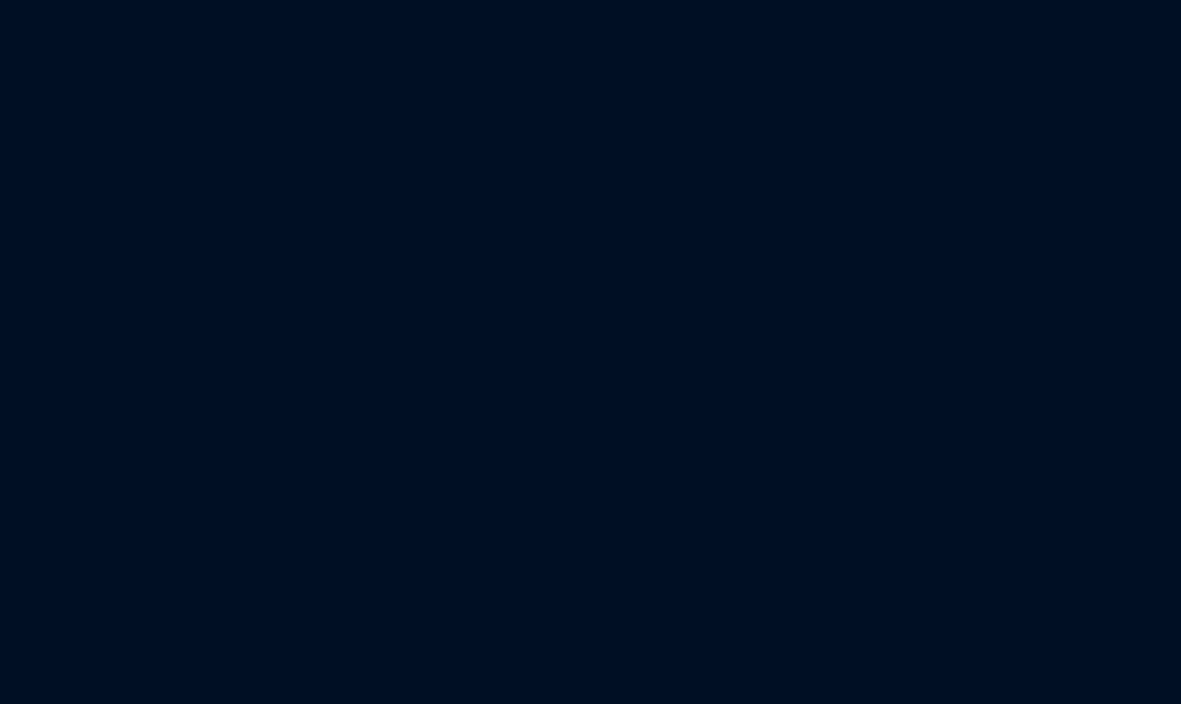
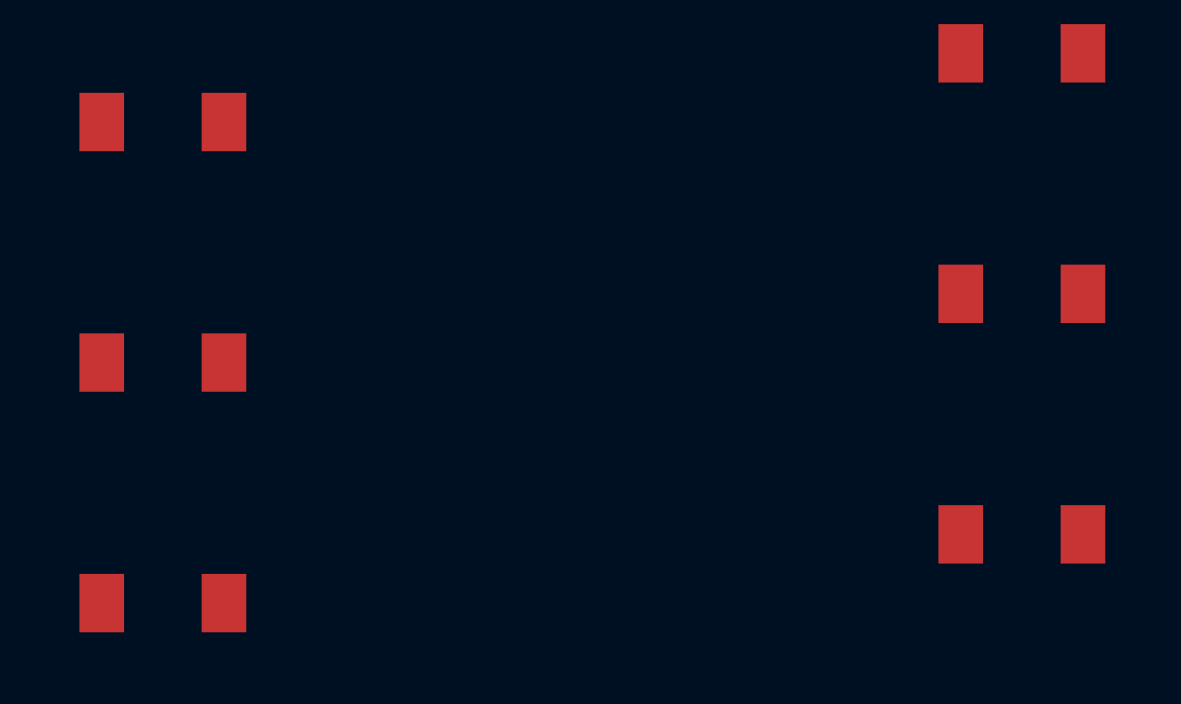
part: none -> (1021, 53)
part: none -> (162, 122)
part: none -> (1021, 293)
part: none -> (162, 362)
part: none -> (1021, 534)
part: none -> (162, 603)

